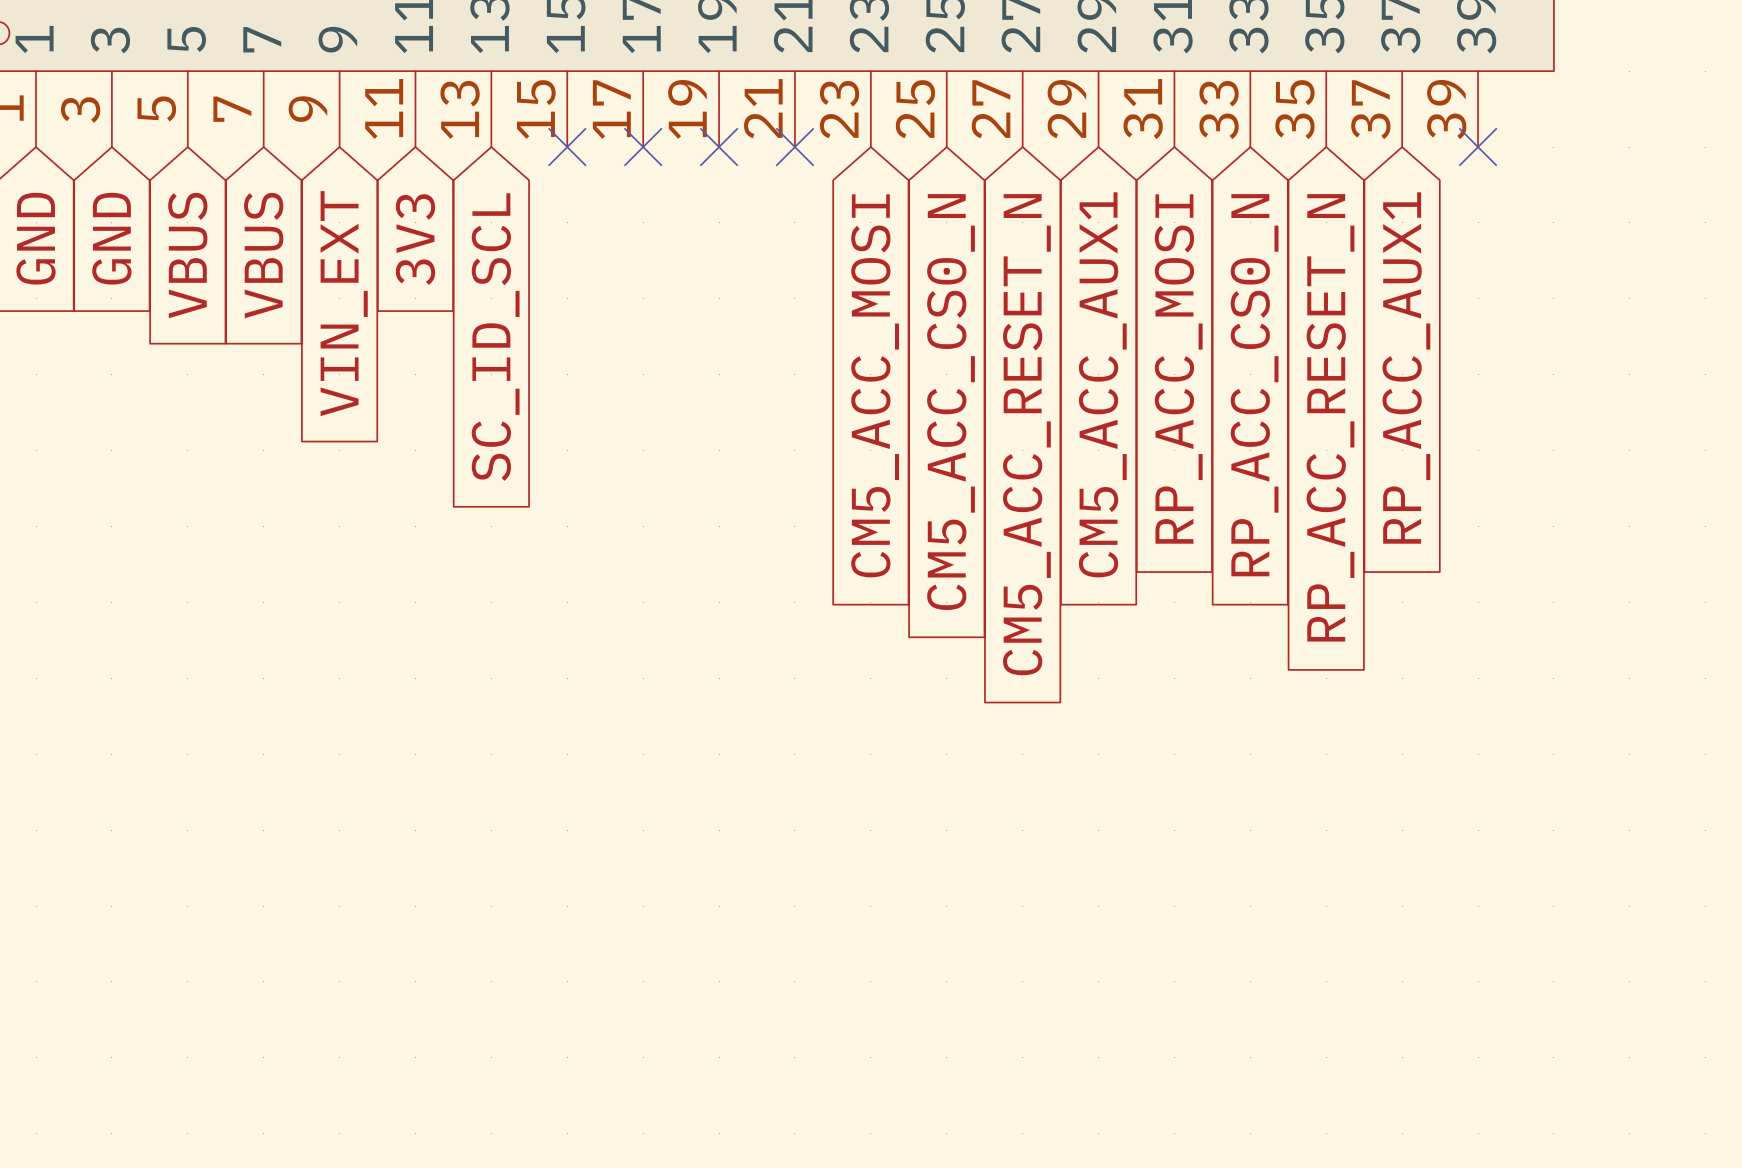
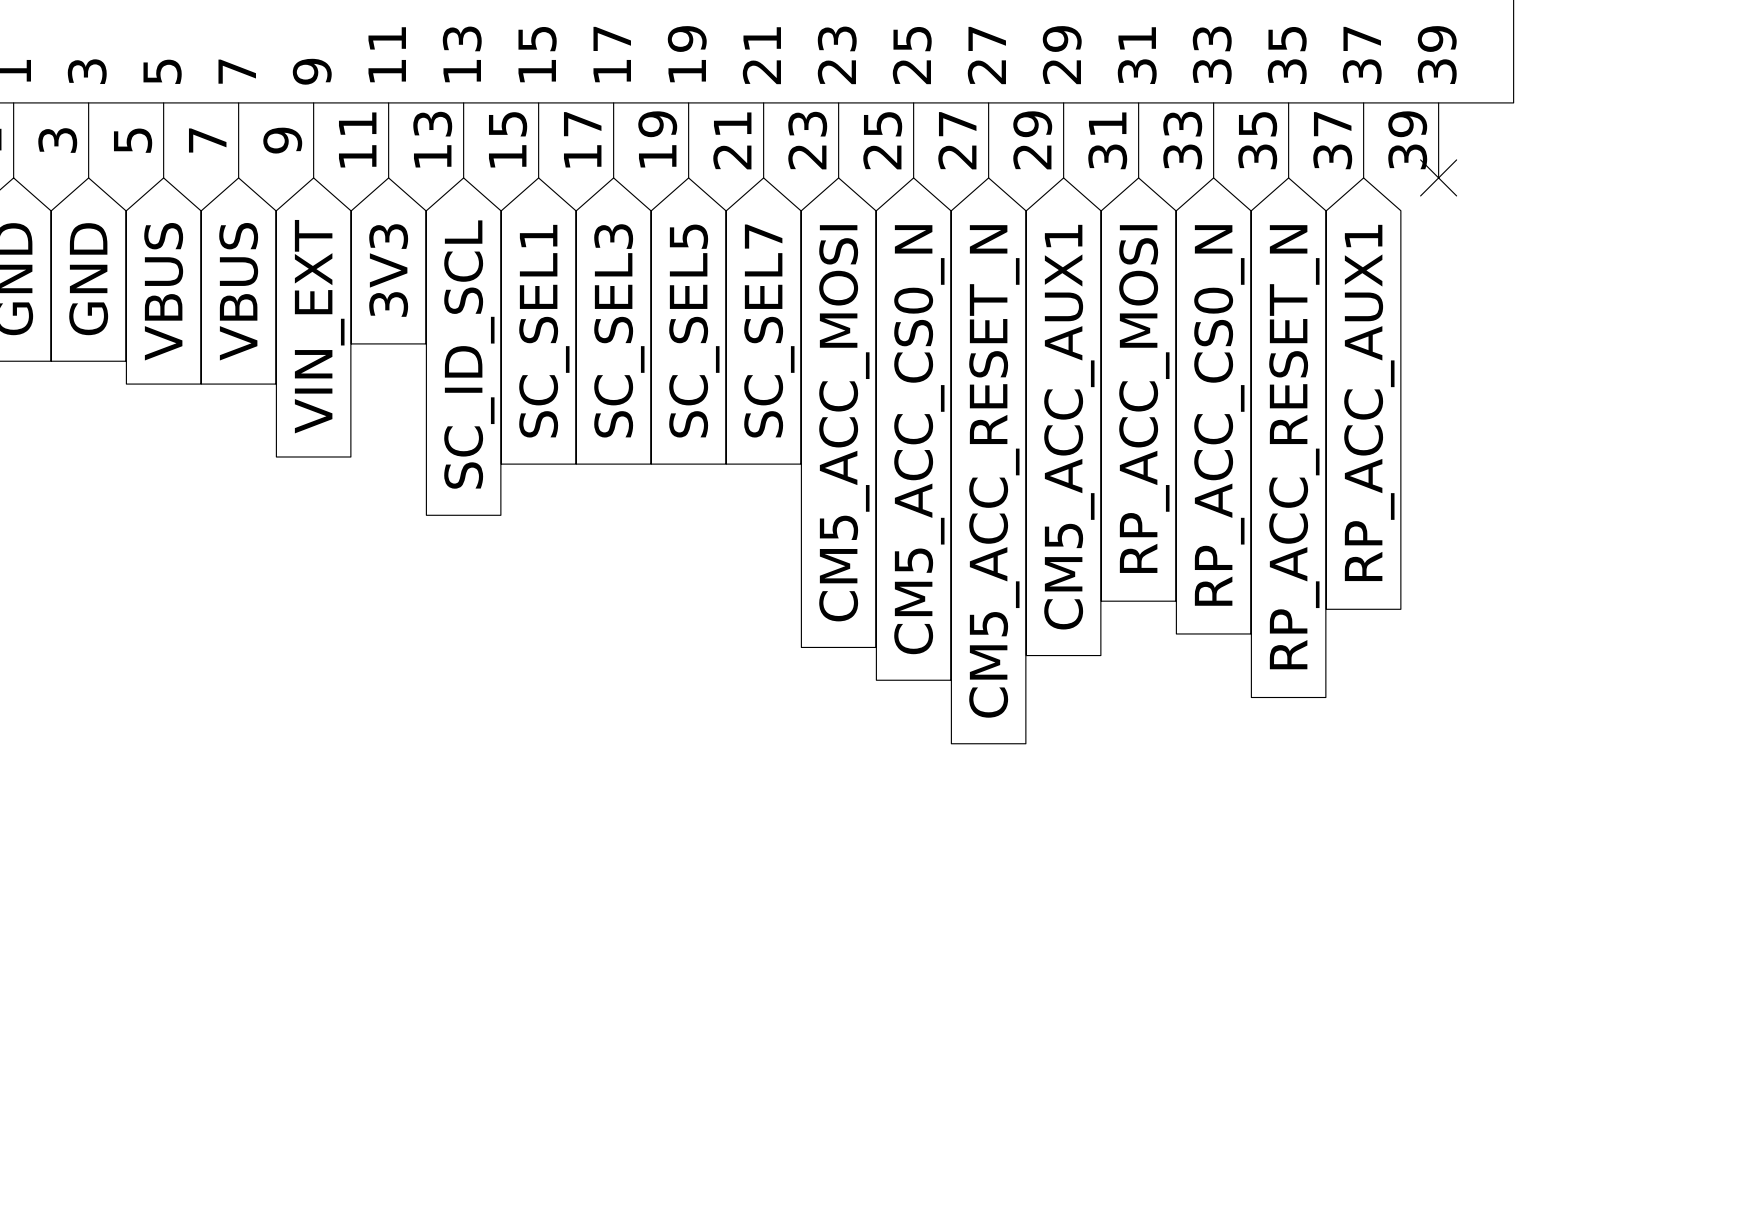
no-connect mark: (567, 147) -> none
no-connect mark: (643, 147) -> none
no-connect mark: (719, 147) -> none
no-connect mark: (794, 147) -> none
global label: none -> SC_SEL1 (544, 331)
global label: none -> SC_SEL3 (619, 330)
global label: none -> SC_SEL5 (694, 331)
global label: none -> SC_SEL7 (769, 331)

